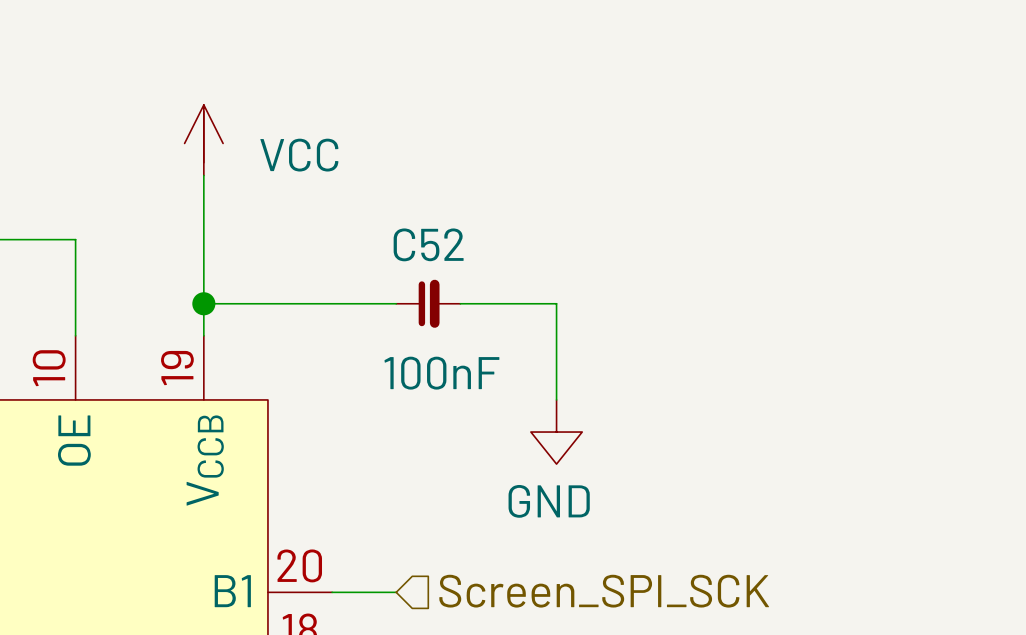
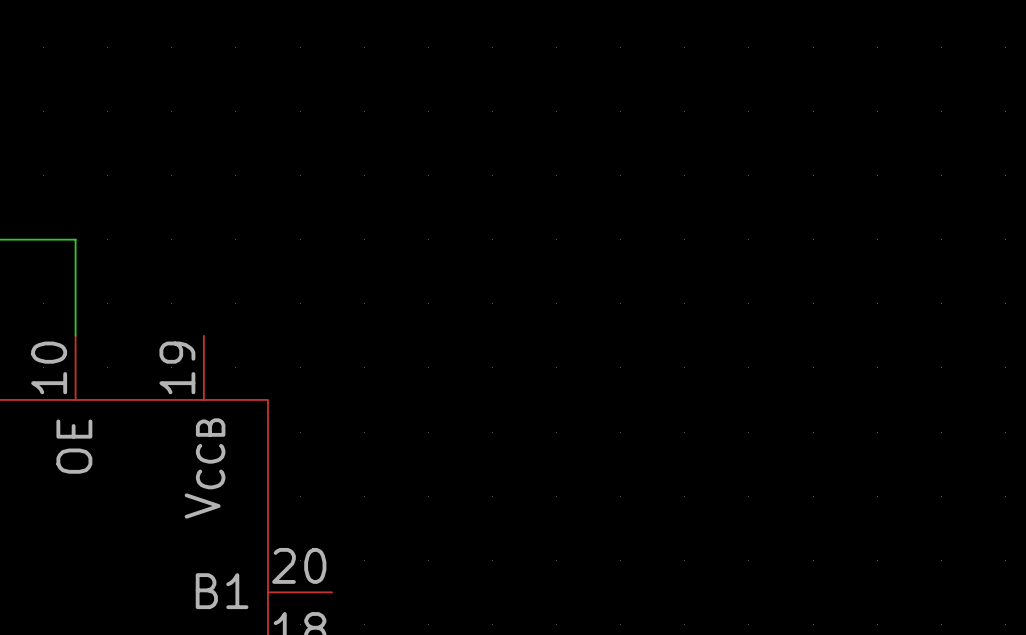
power symbol: VCC (203, 140) -> none
wire: (203, 175) (203, 335) -> none
wire: (203, 303) (396, 303) -> none
junction: (203, 303) -> none
C52: 100nF (428, 303) -> none
wire: (460, 303) (556, 303) (556, 399) -> none
power symbol: GND (556, 432) -> none
hierarchical label: Screen_SPI_SCK (604, 591) -> none
wire: (332, 592) (396, 592) -> none

